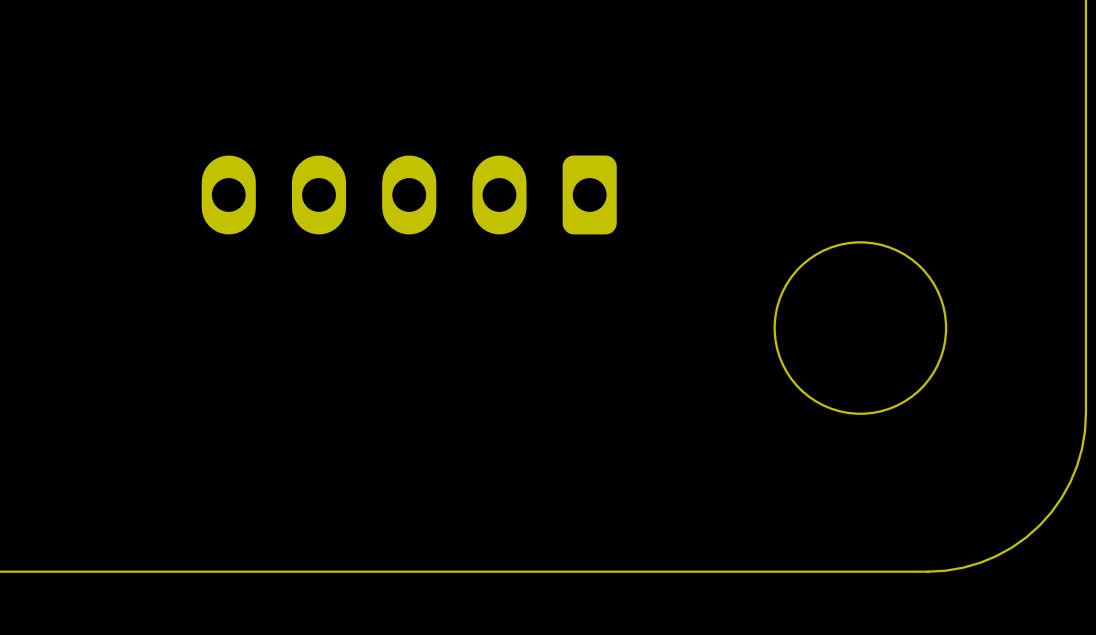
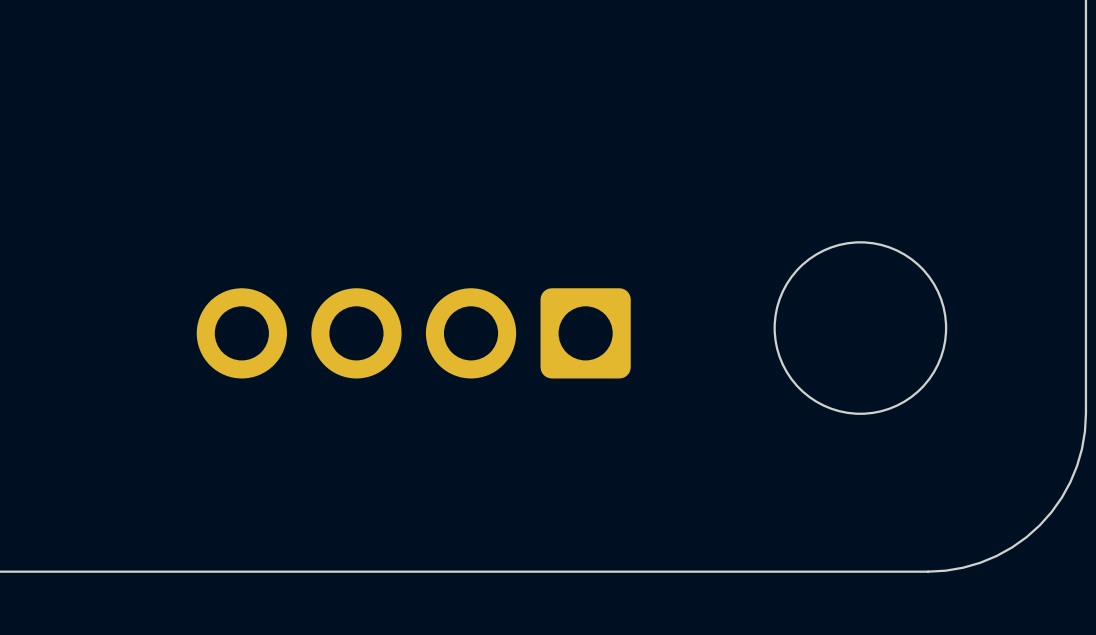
part: (409, 194) -> none
part: none -> (413, 333)

